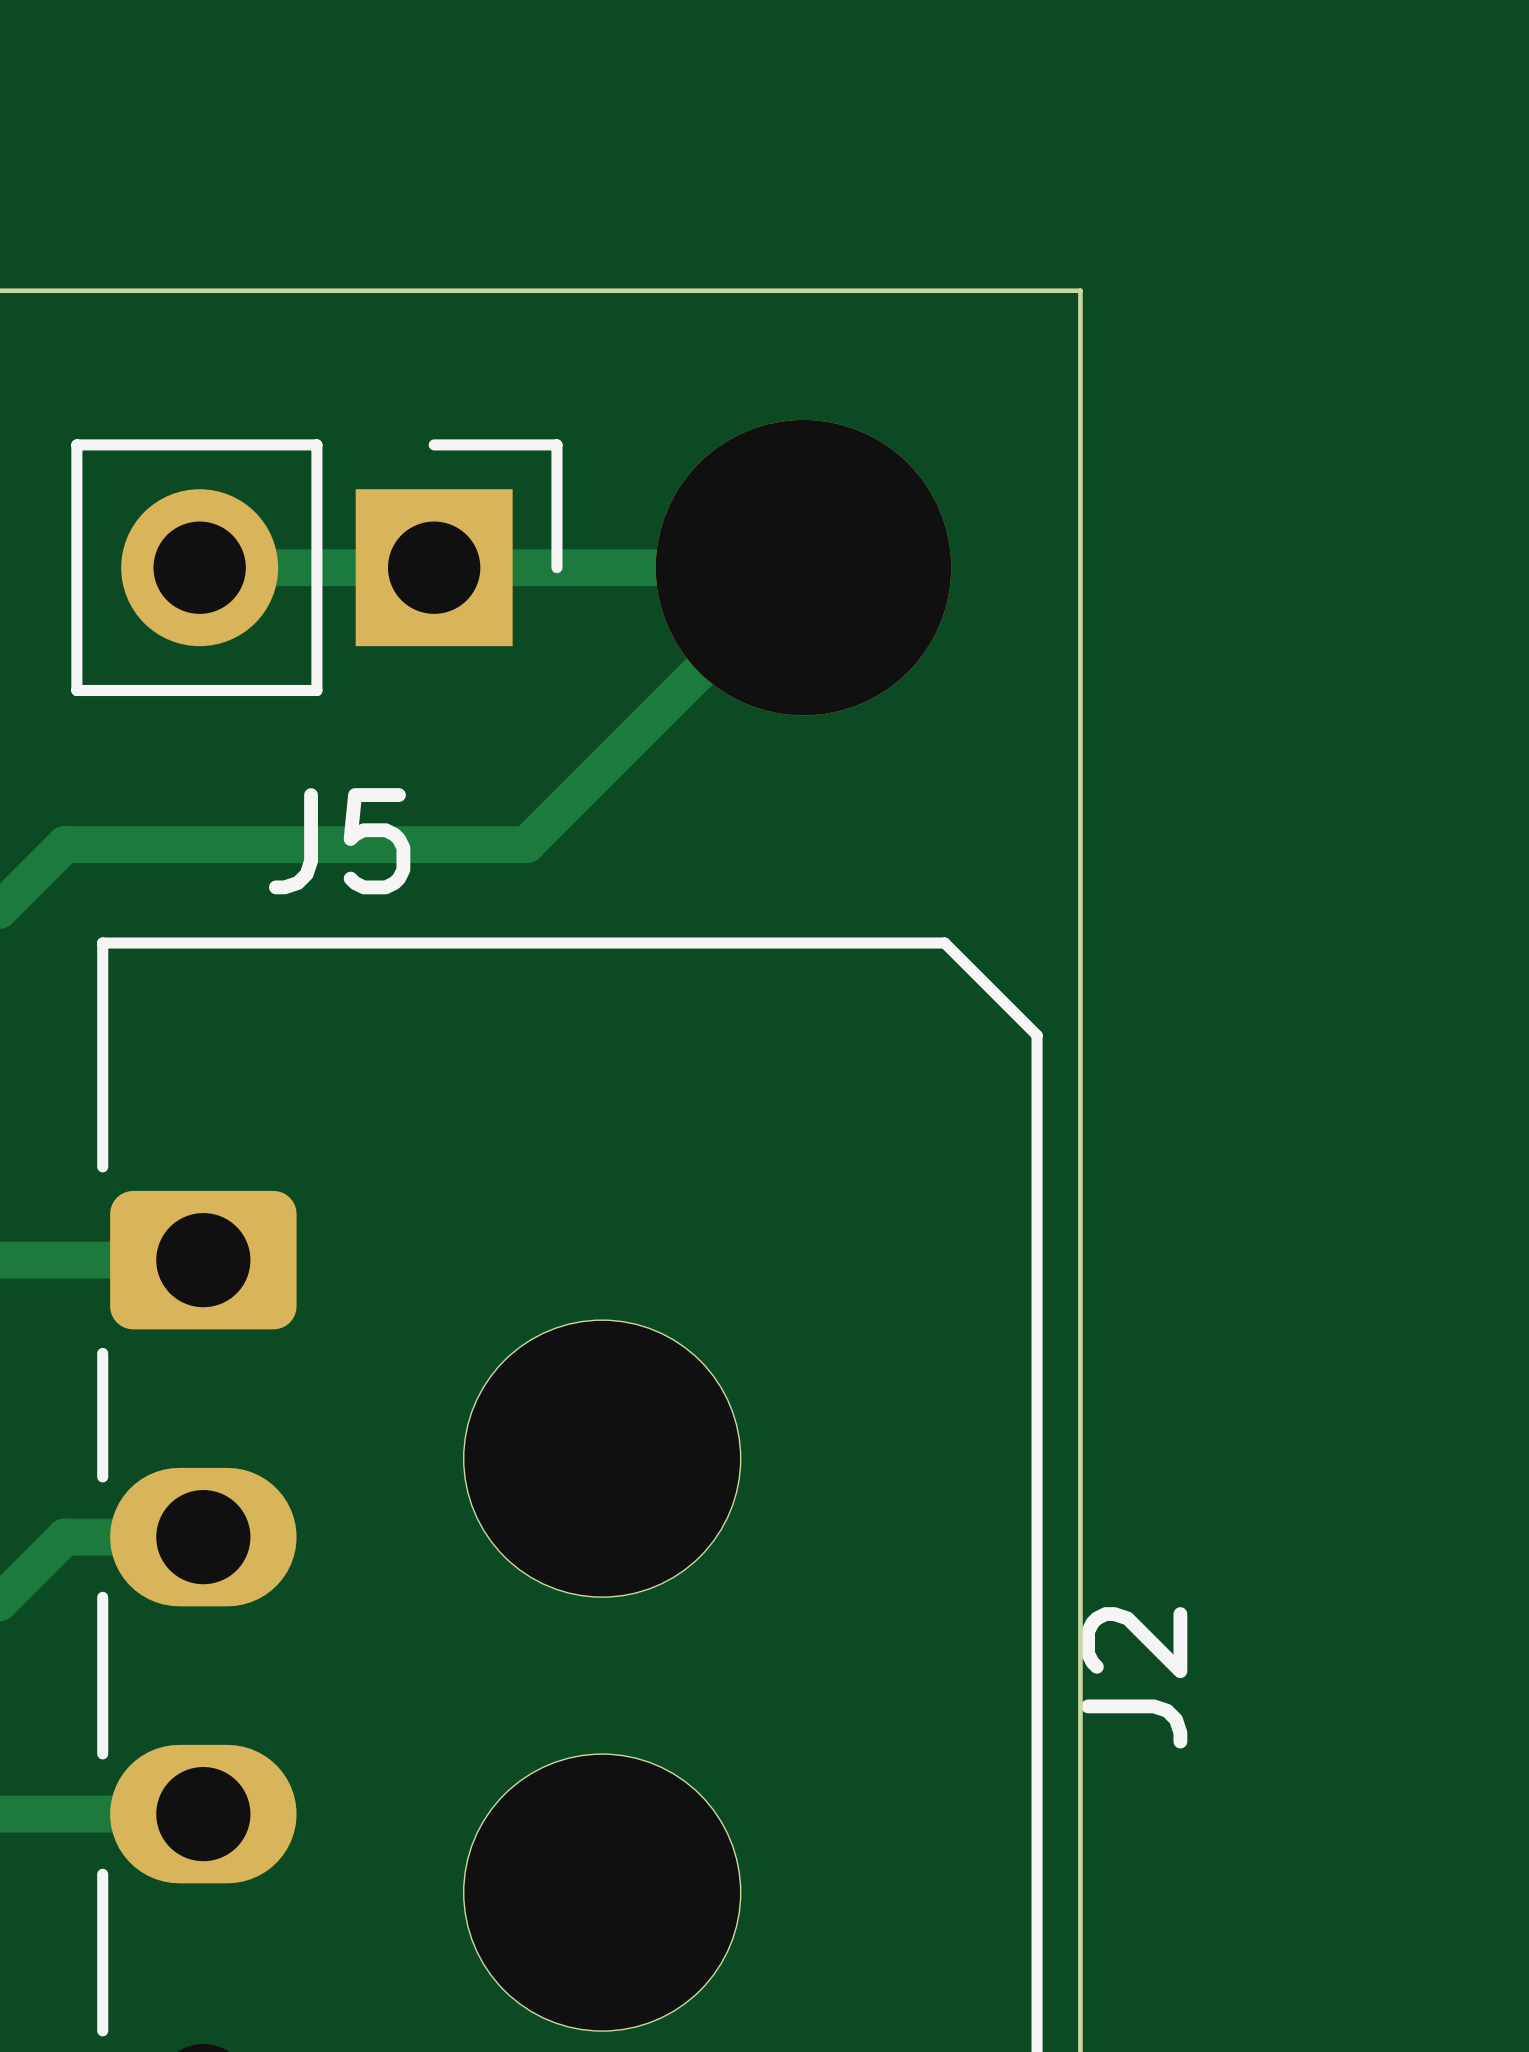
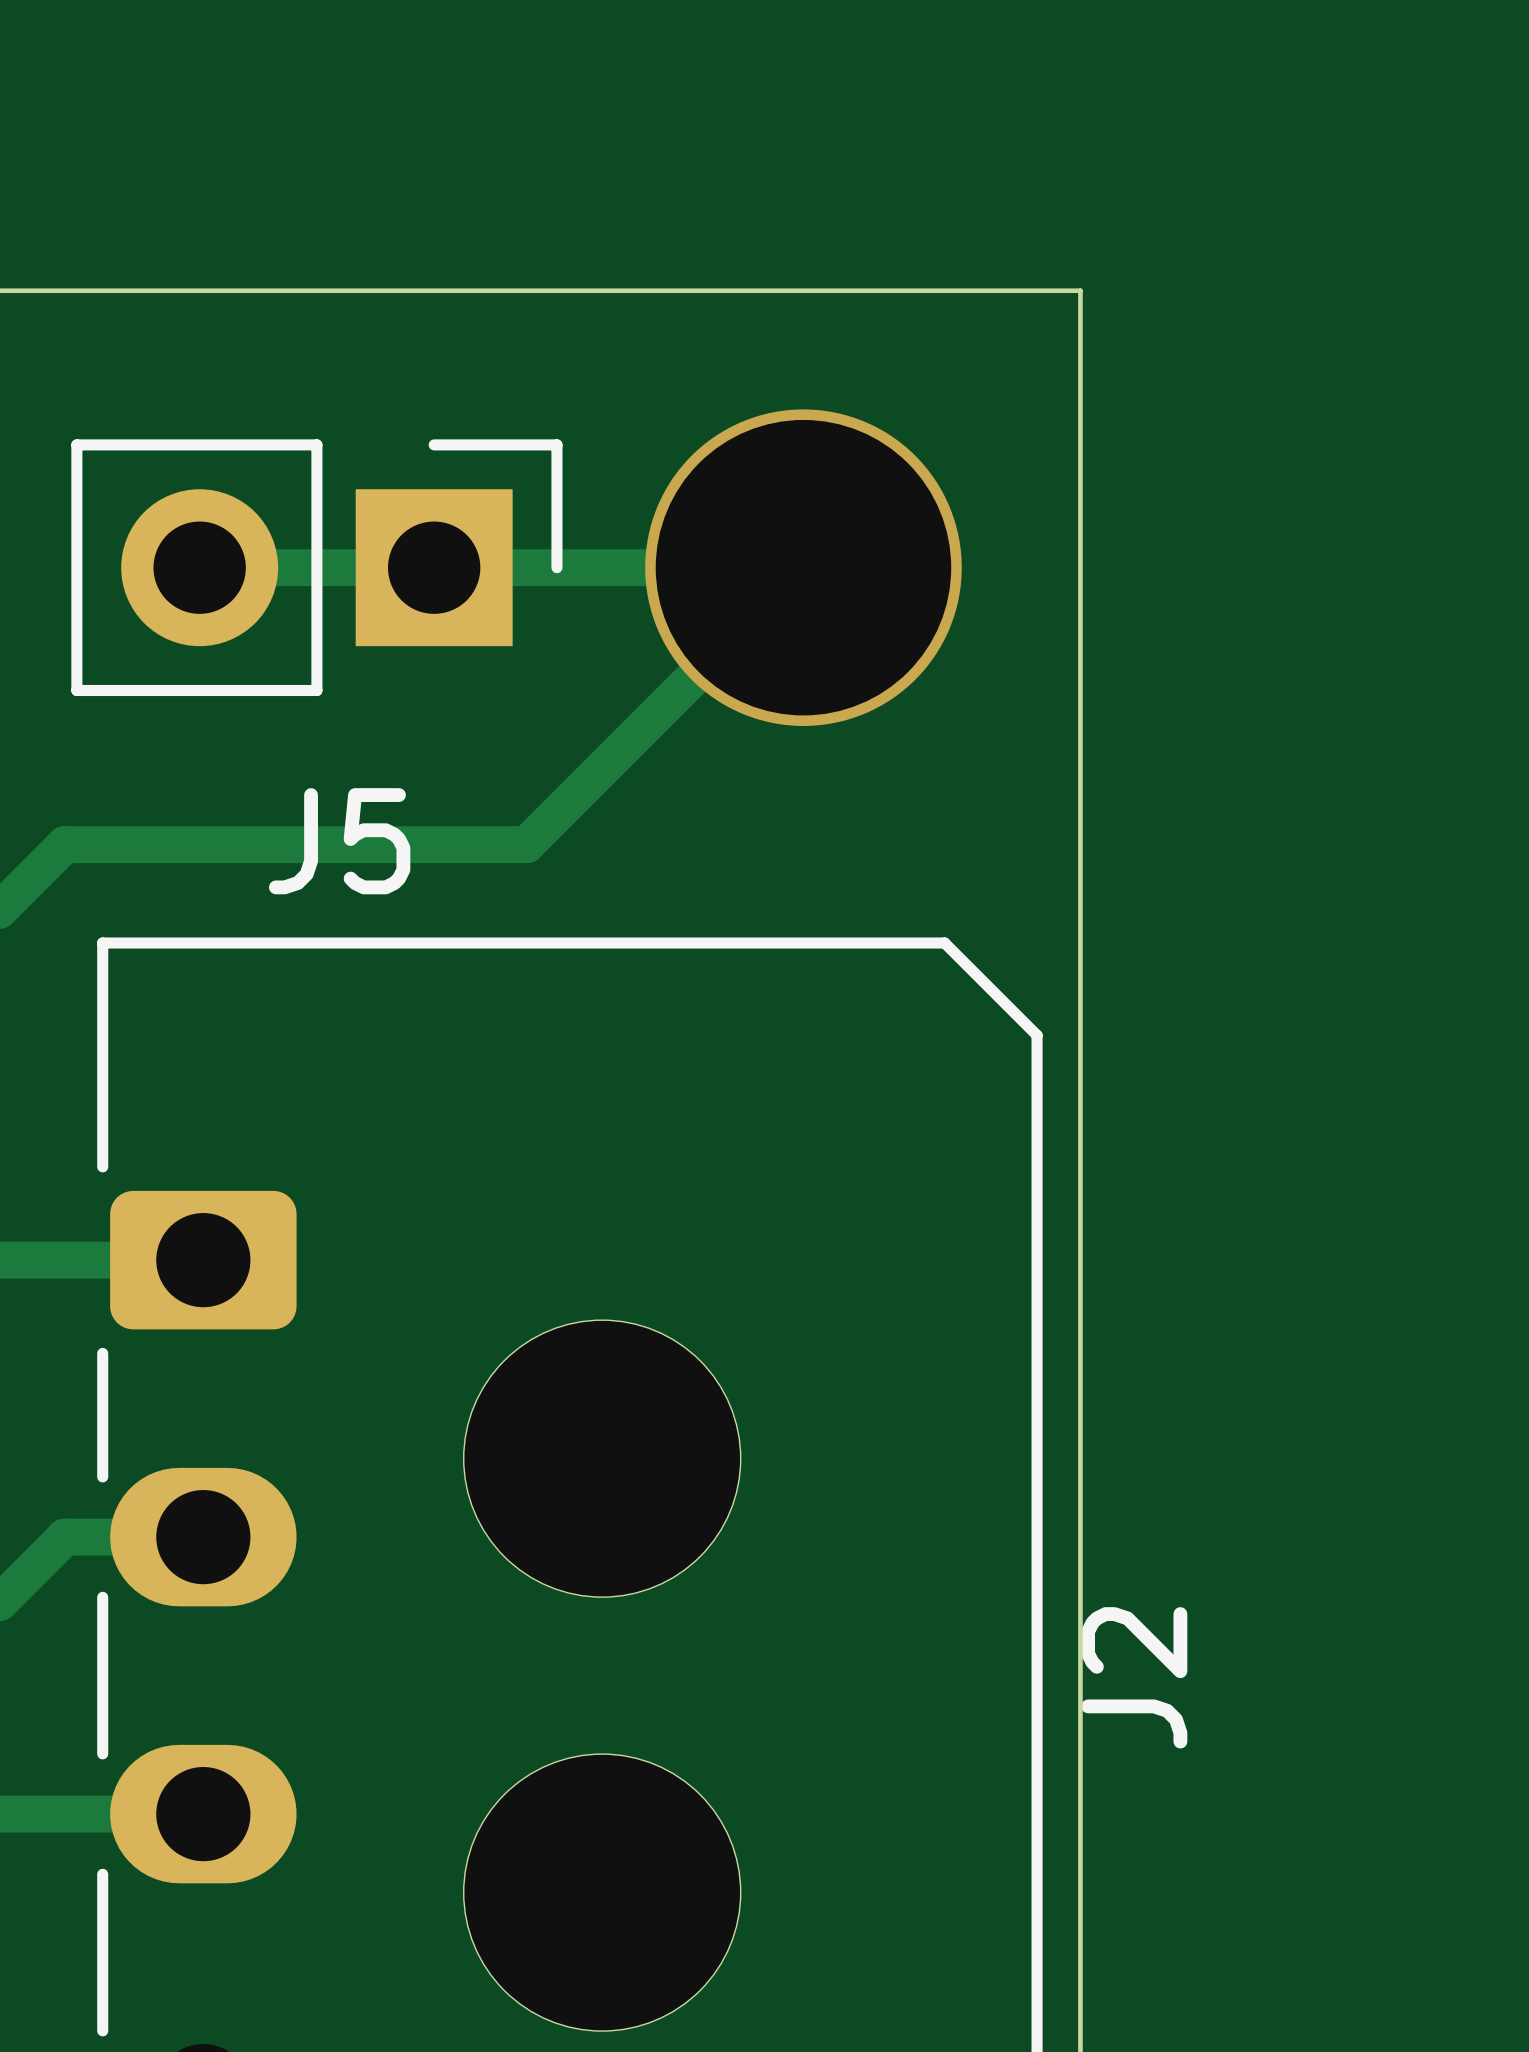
via size: [655, 419, 952, 716] -> [645, 409, 962, 726]

